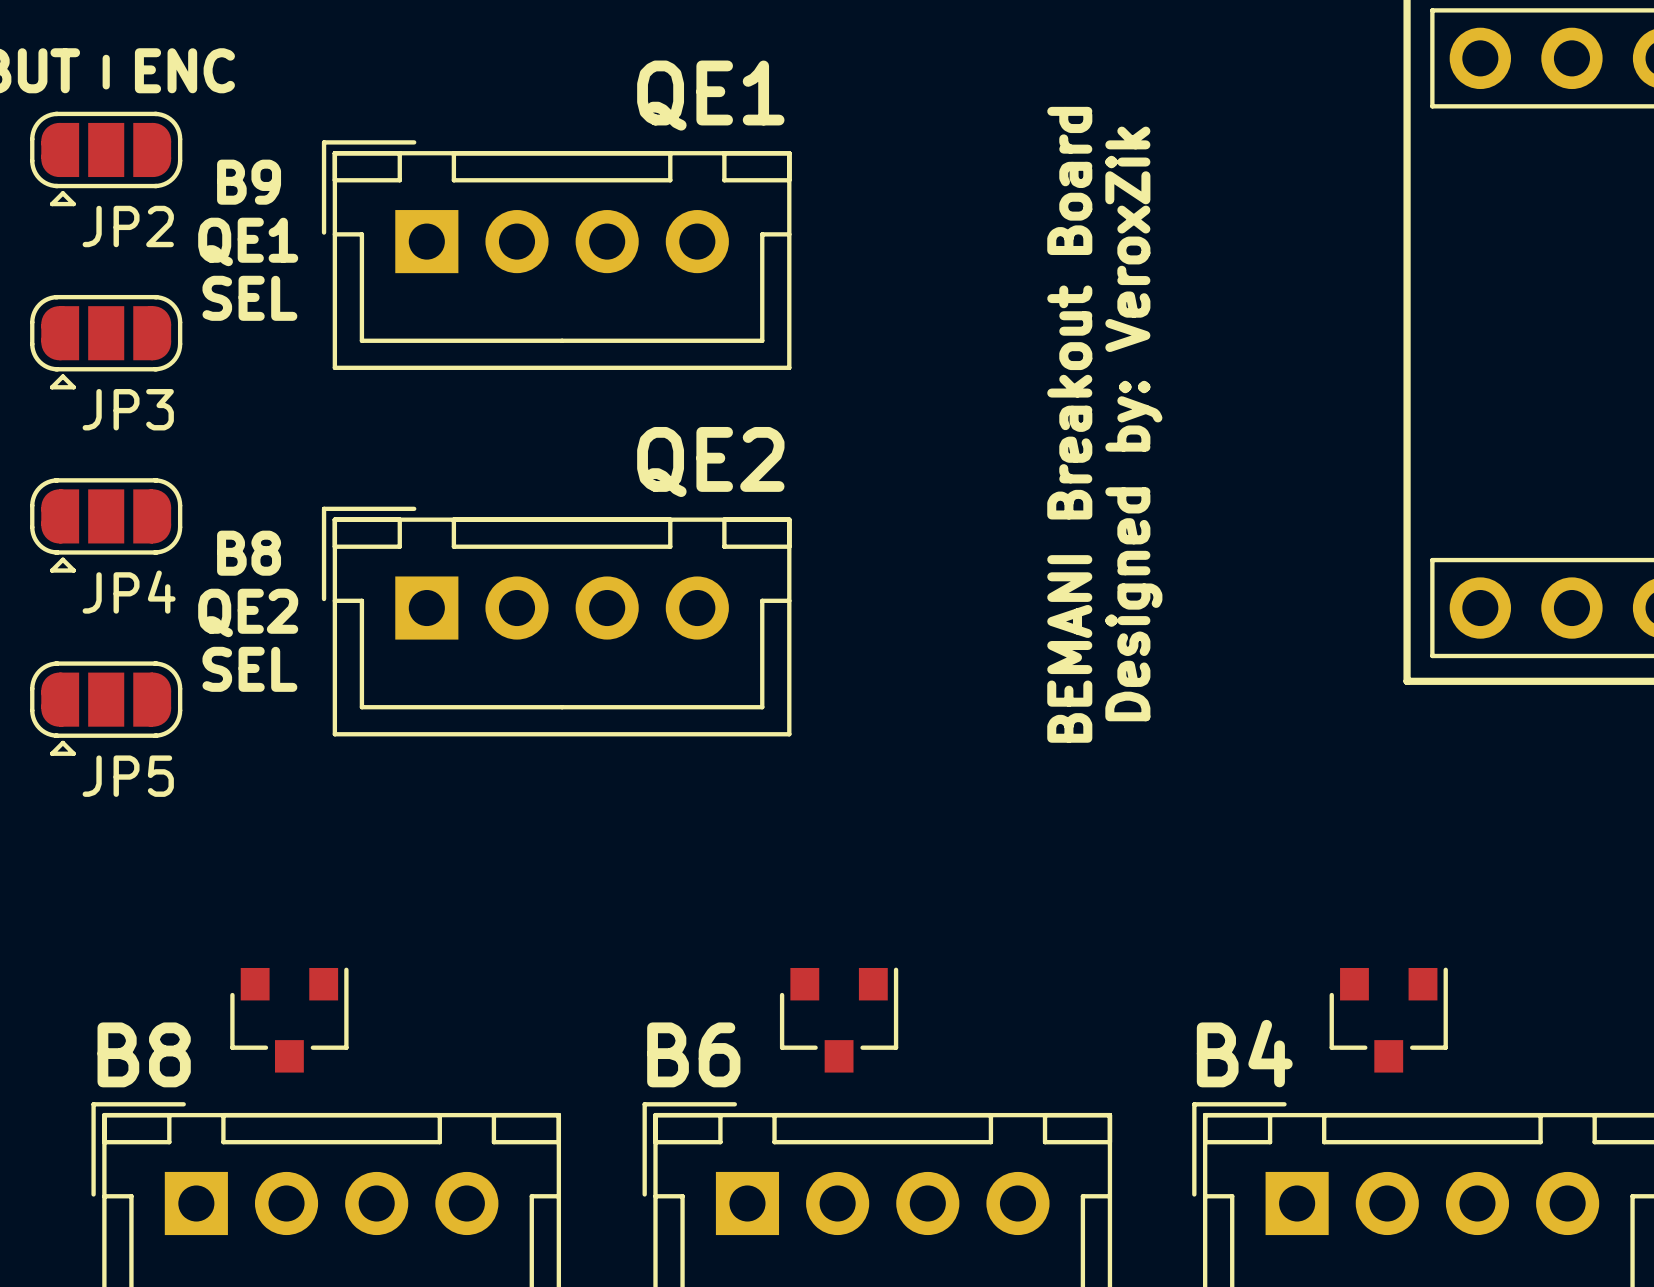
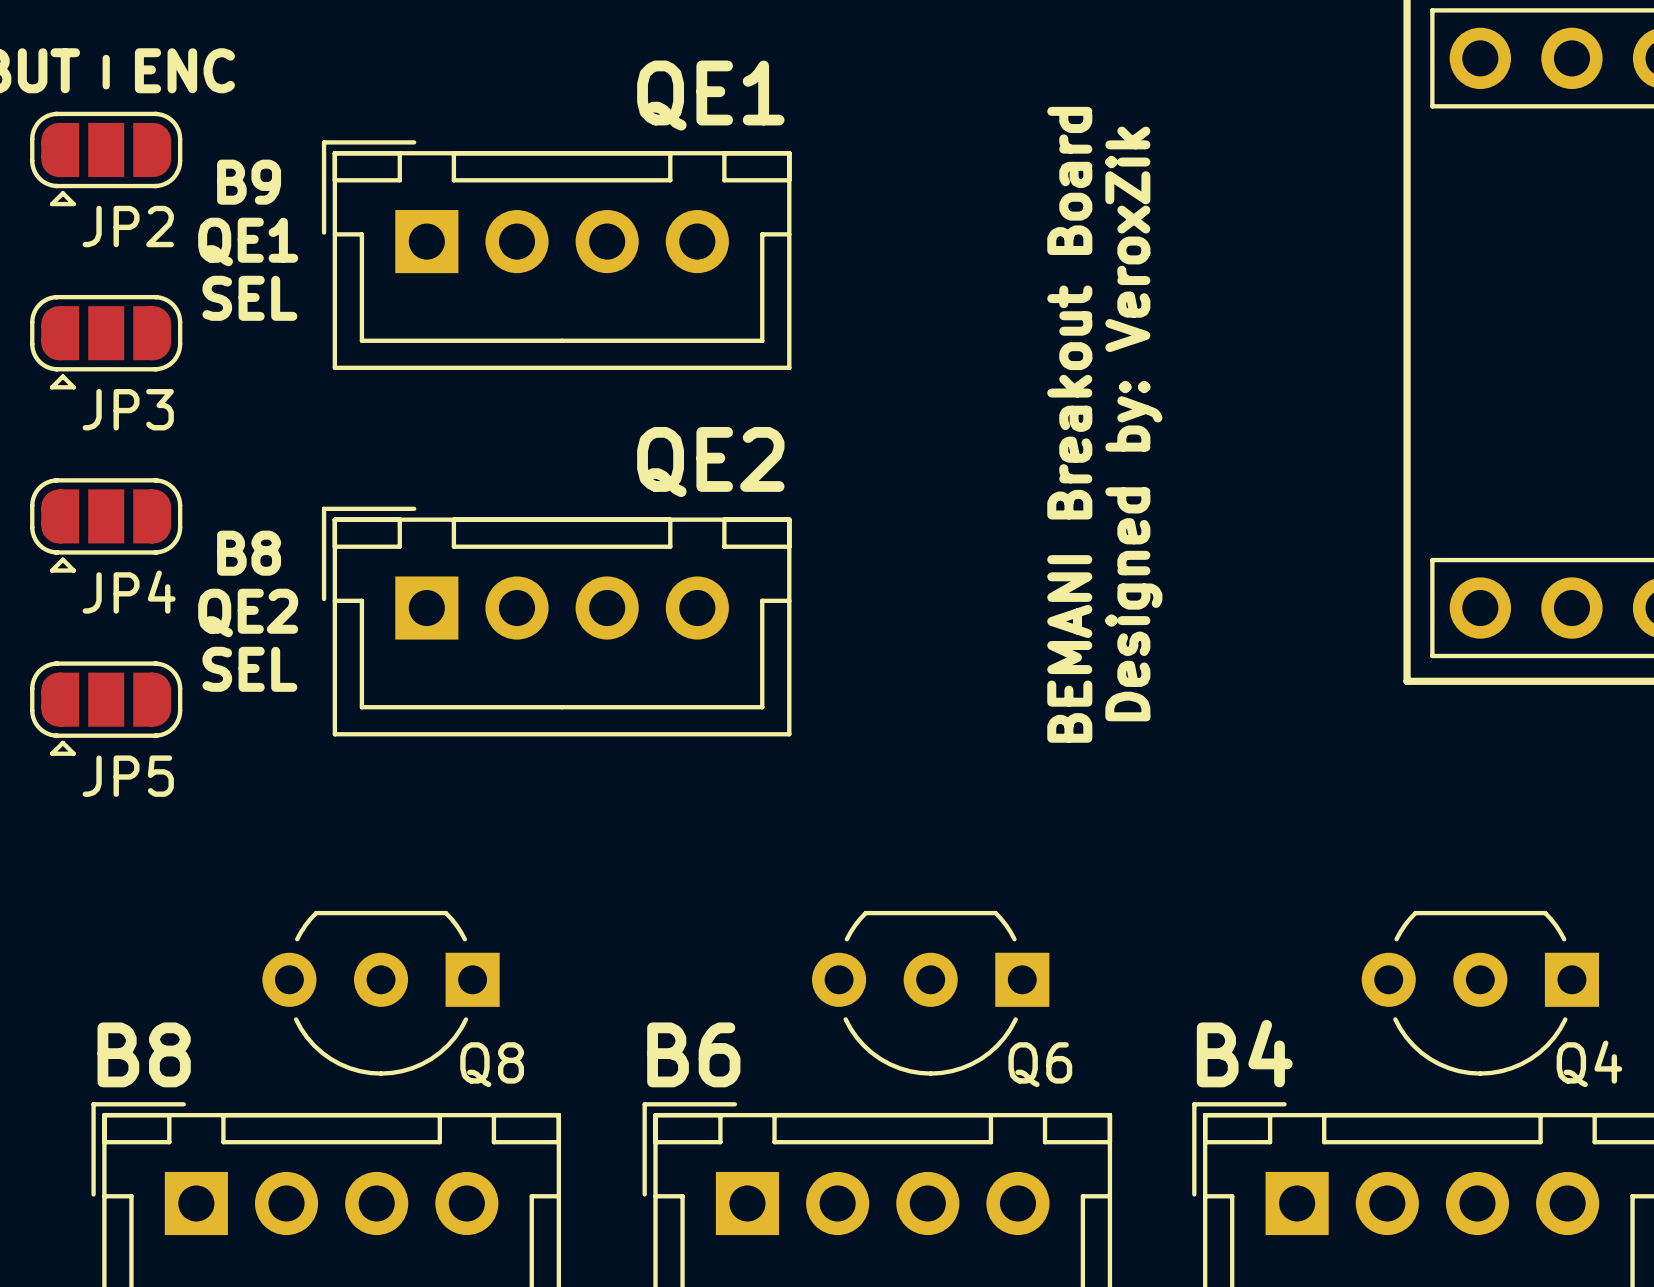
Q8: none -> (381, 993)
Q6: none -> (930, 993)
Q4: none -> (1480, 993)
part: (289, 1020) -> none
part: (839, 1020) -> none
part: (1388, 1020) -> none

